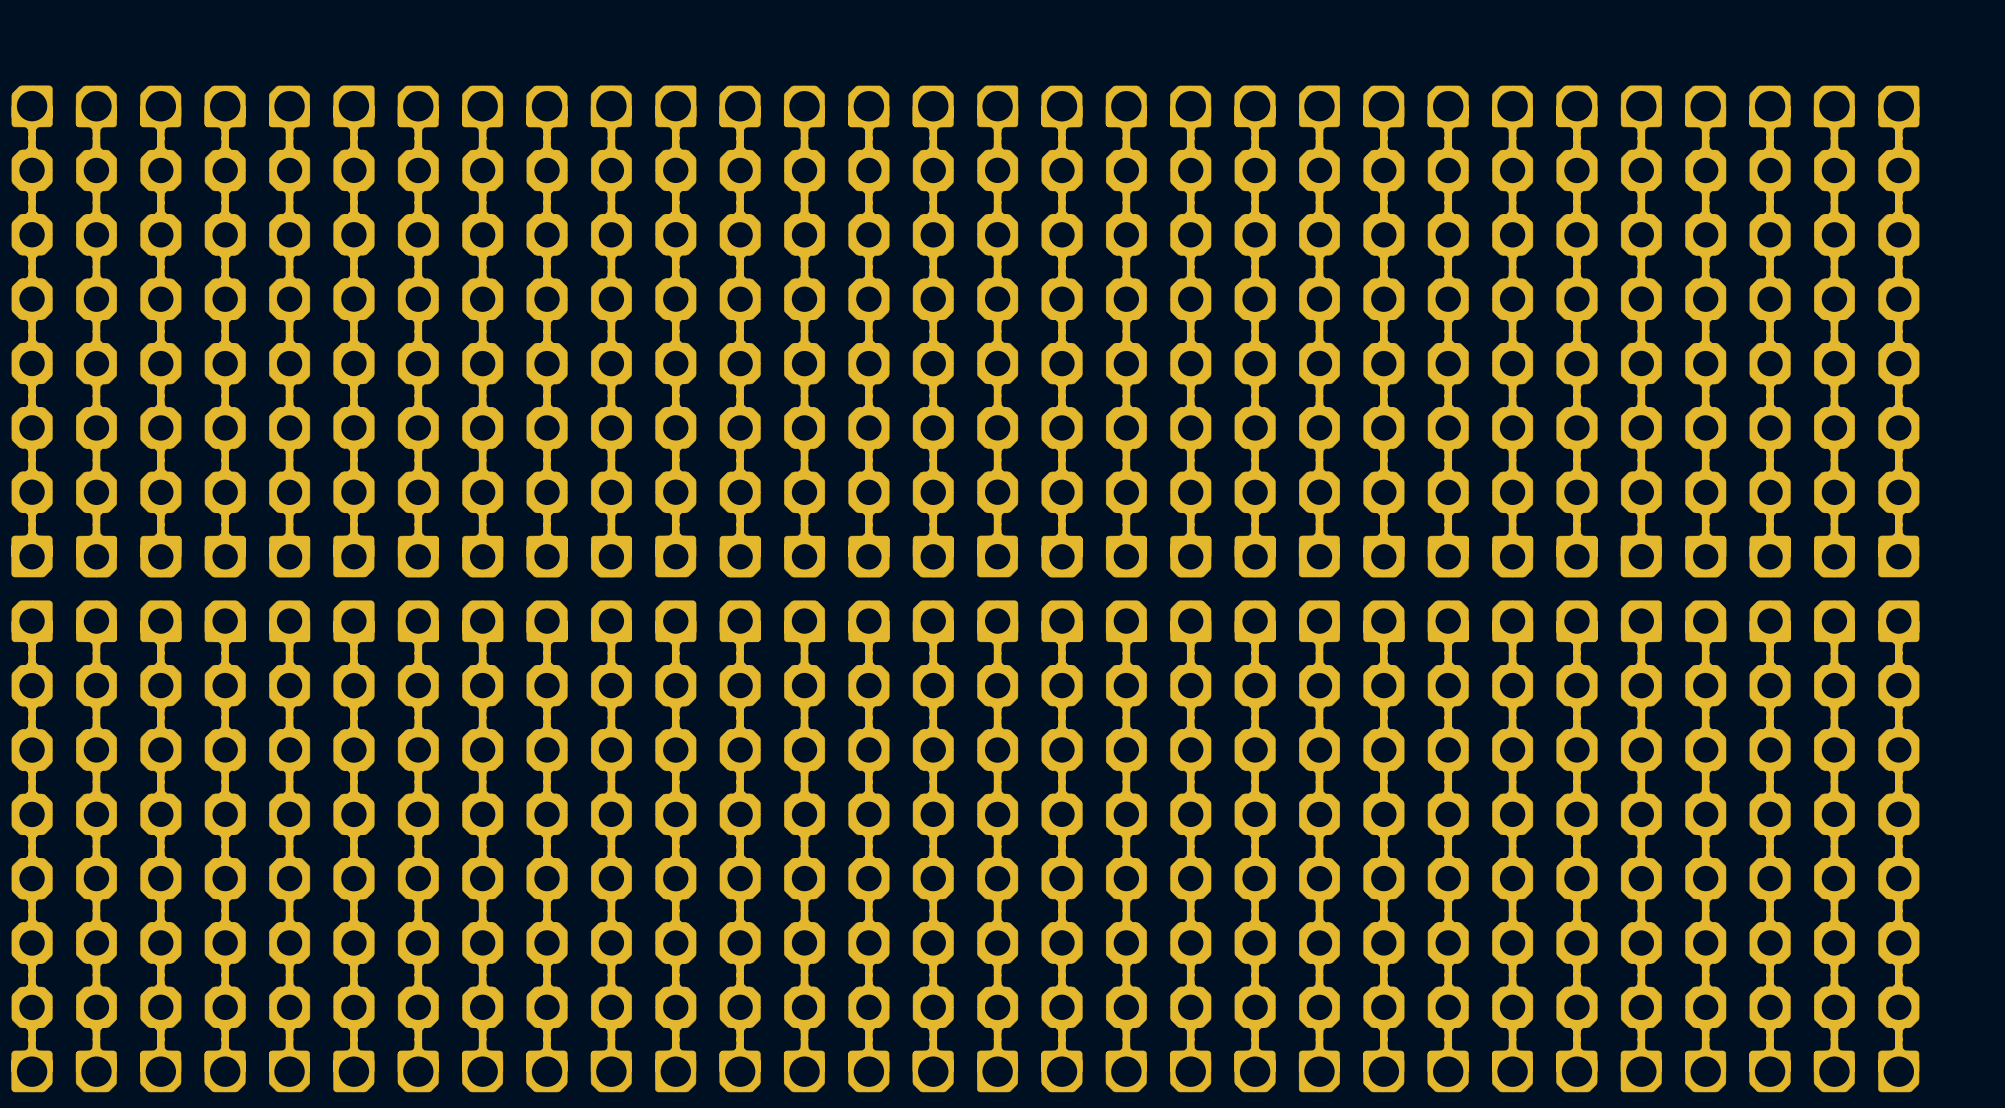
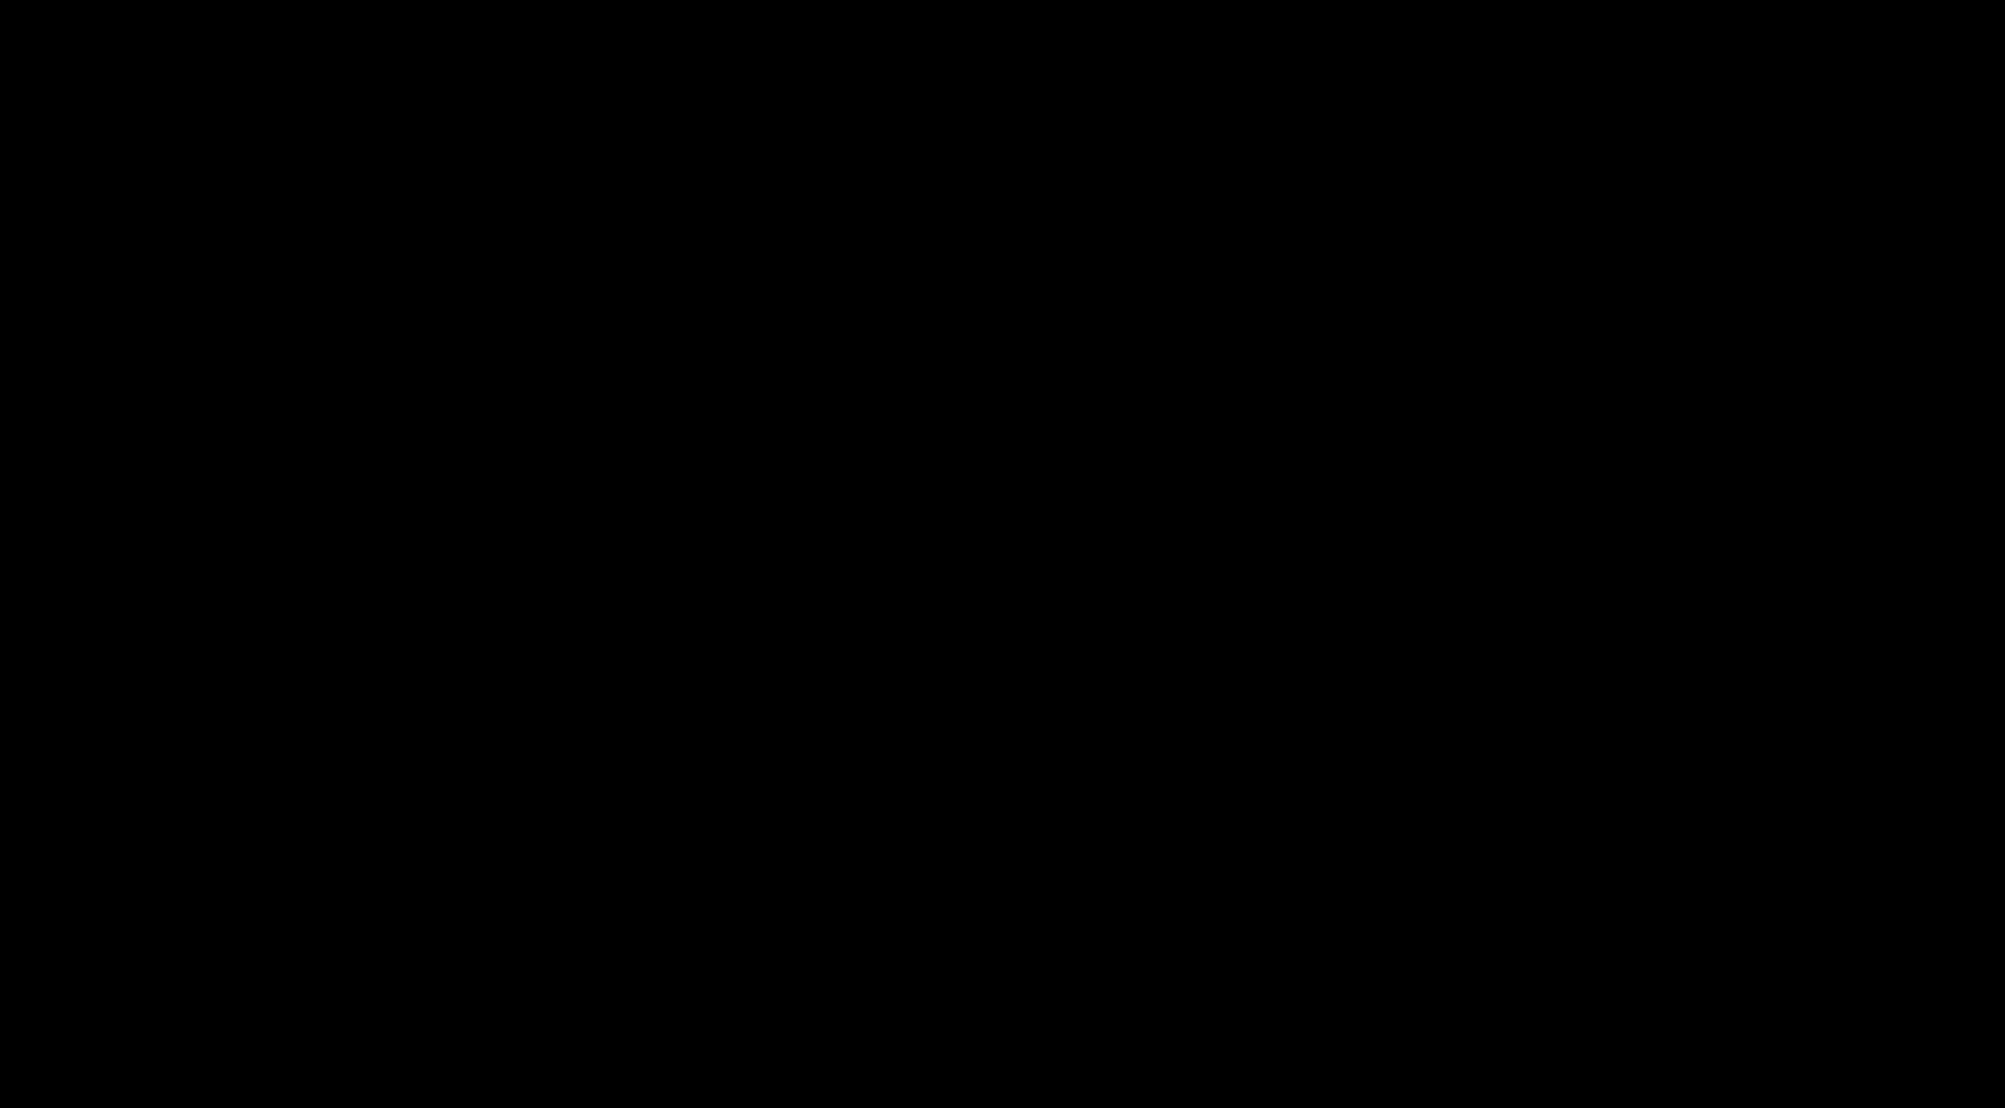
part: (965, 588) -> none

